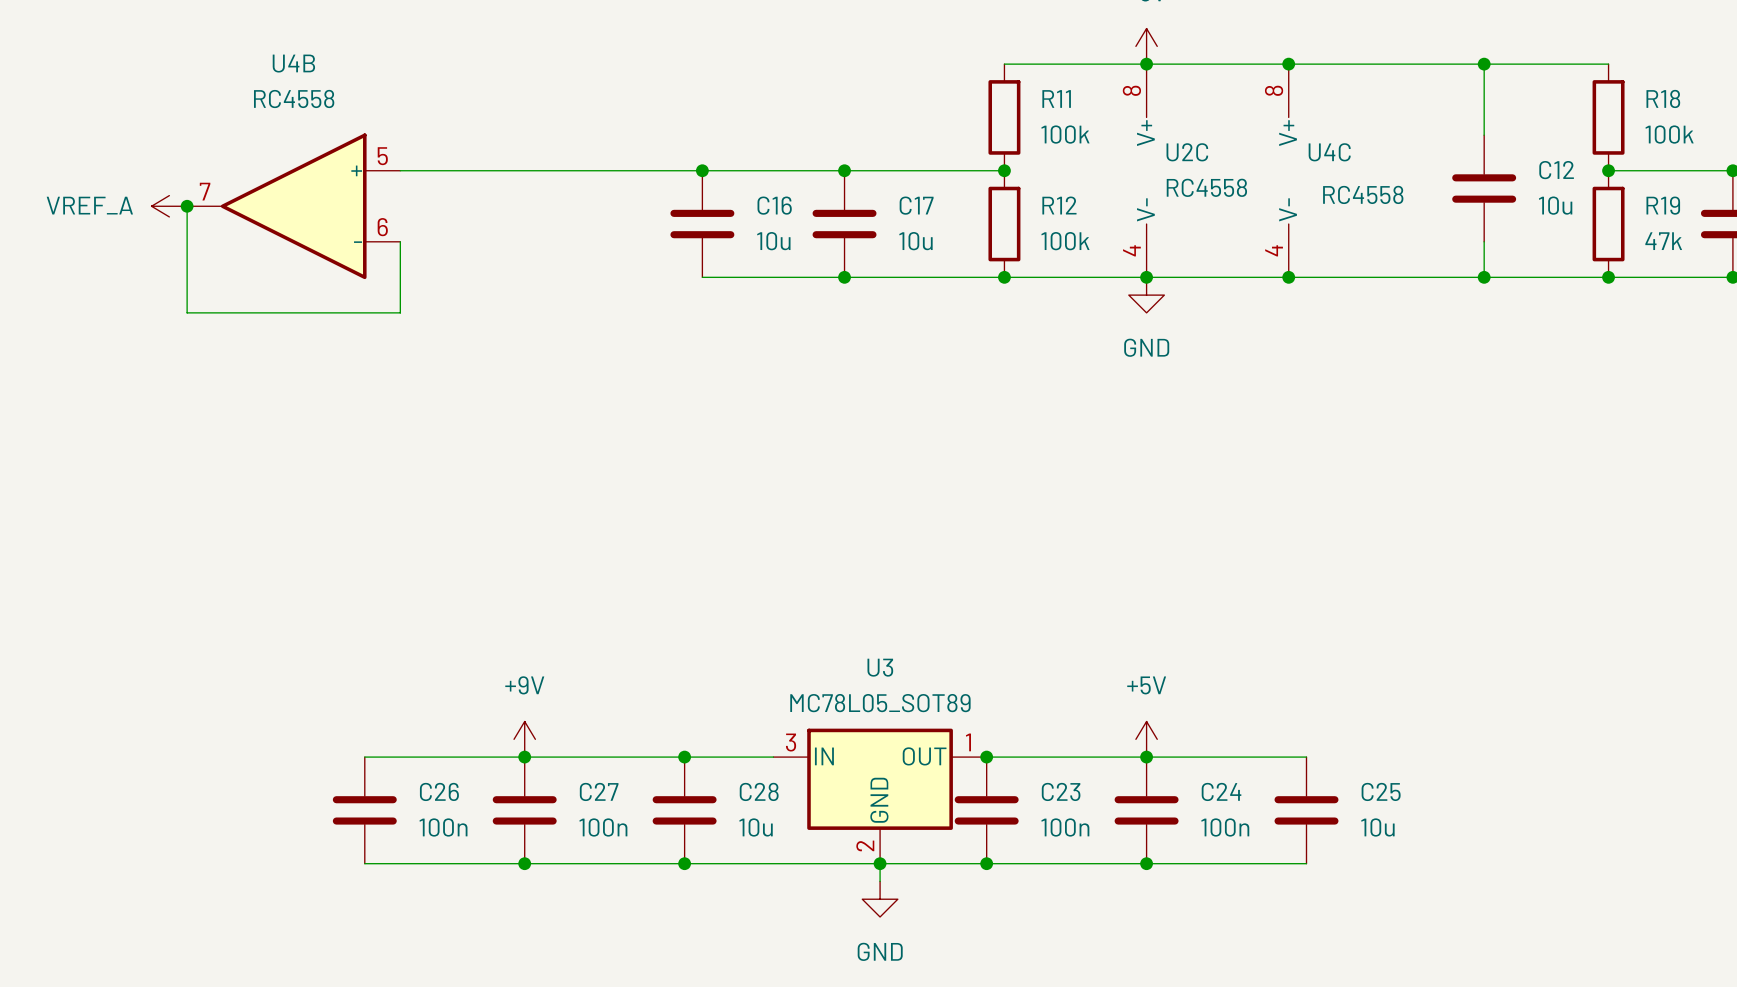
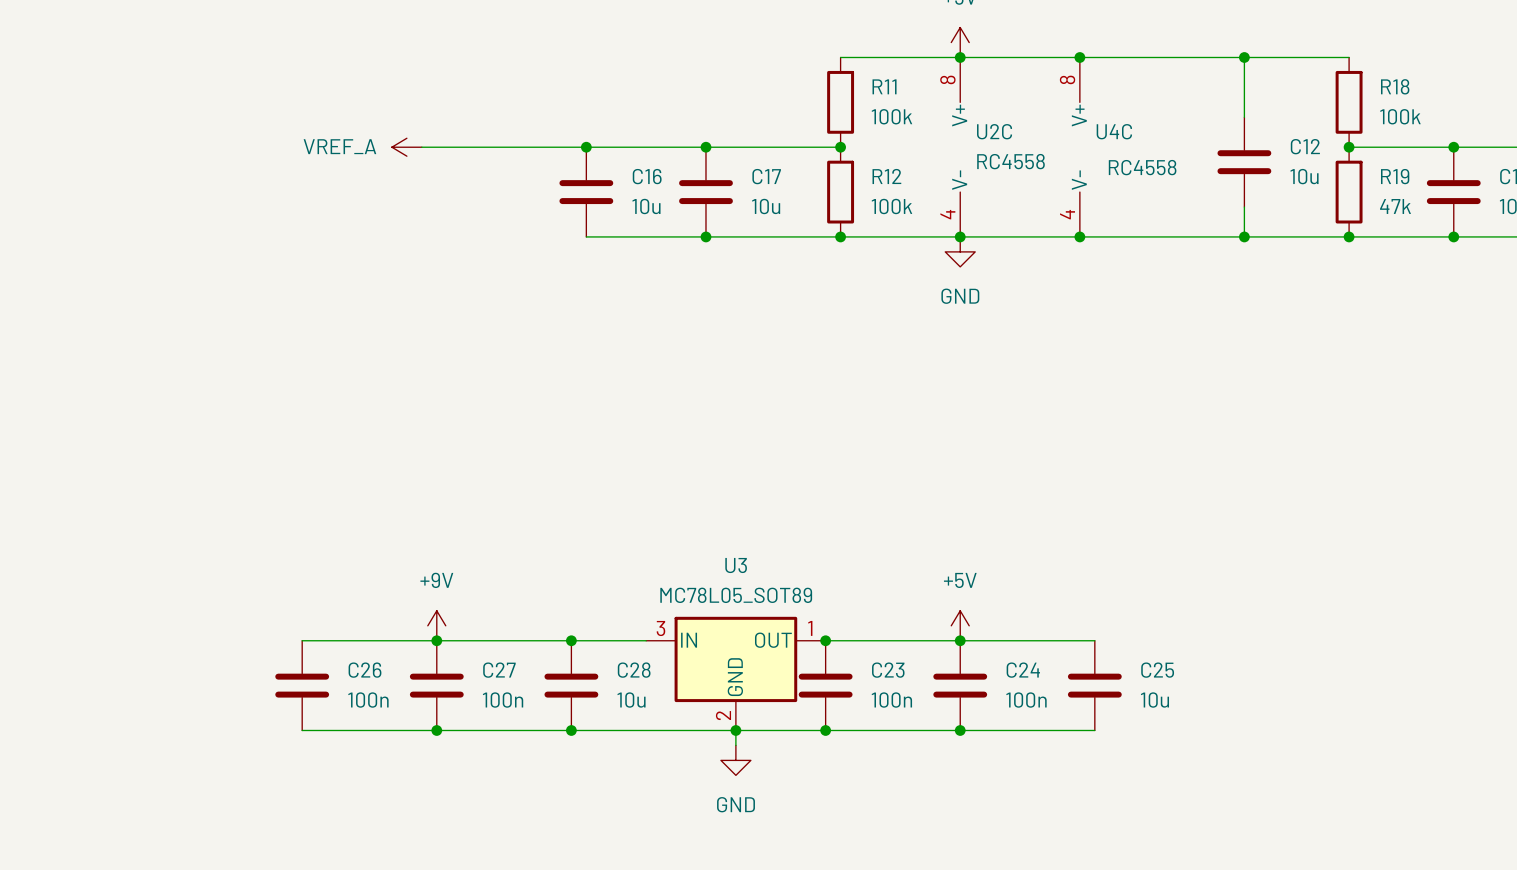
wire: (400, 170) (506, 170) -> none
power symbol position: VREF_A (169, 206) -> VREF_A (406, 147)
wire: (187, 206) (187, 312) (400, 312) (400, 241) -> none
junction: (187, 206) -> none
U4B: RC4558 (293, 206) -> none

